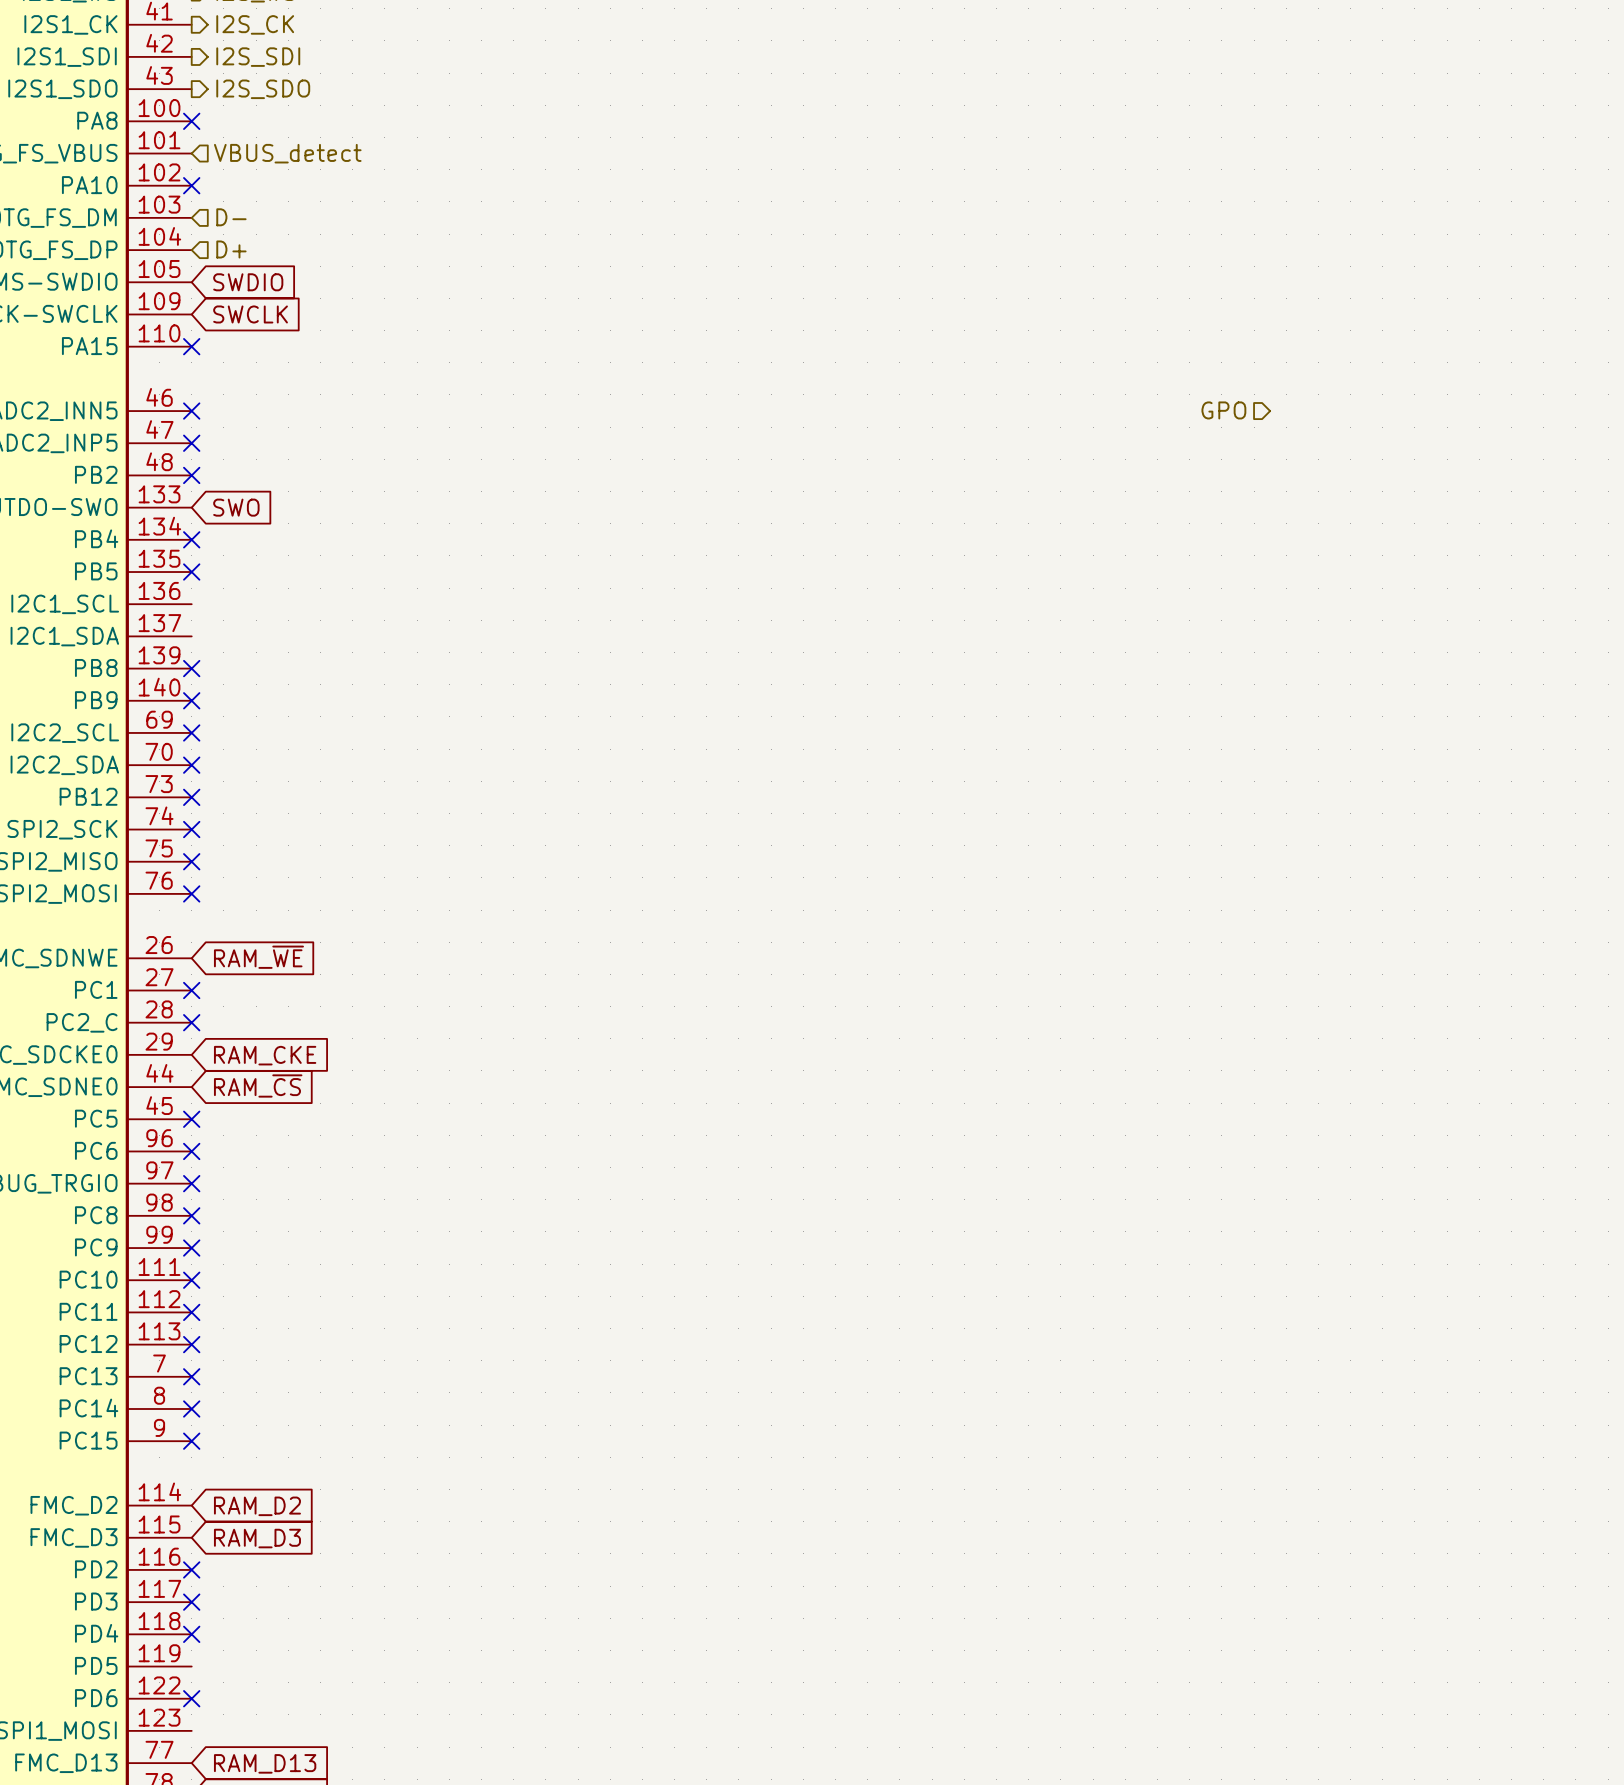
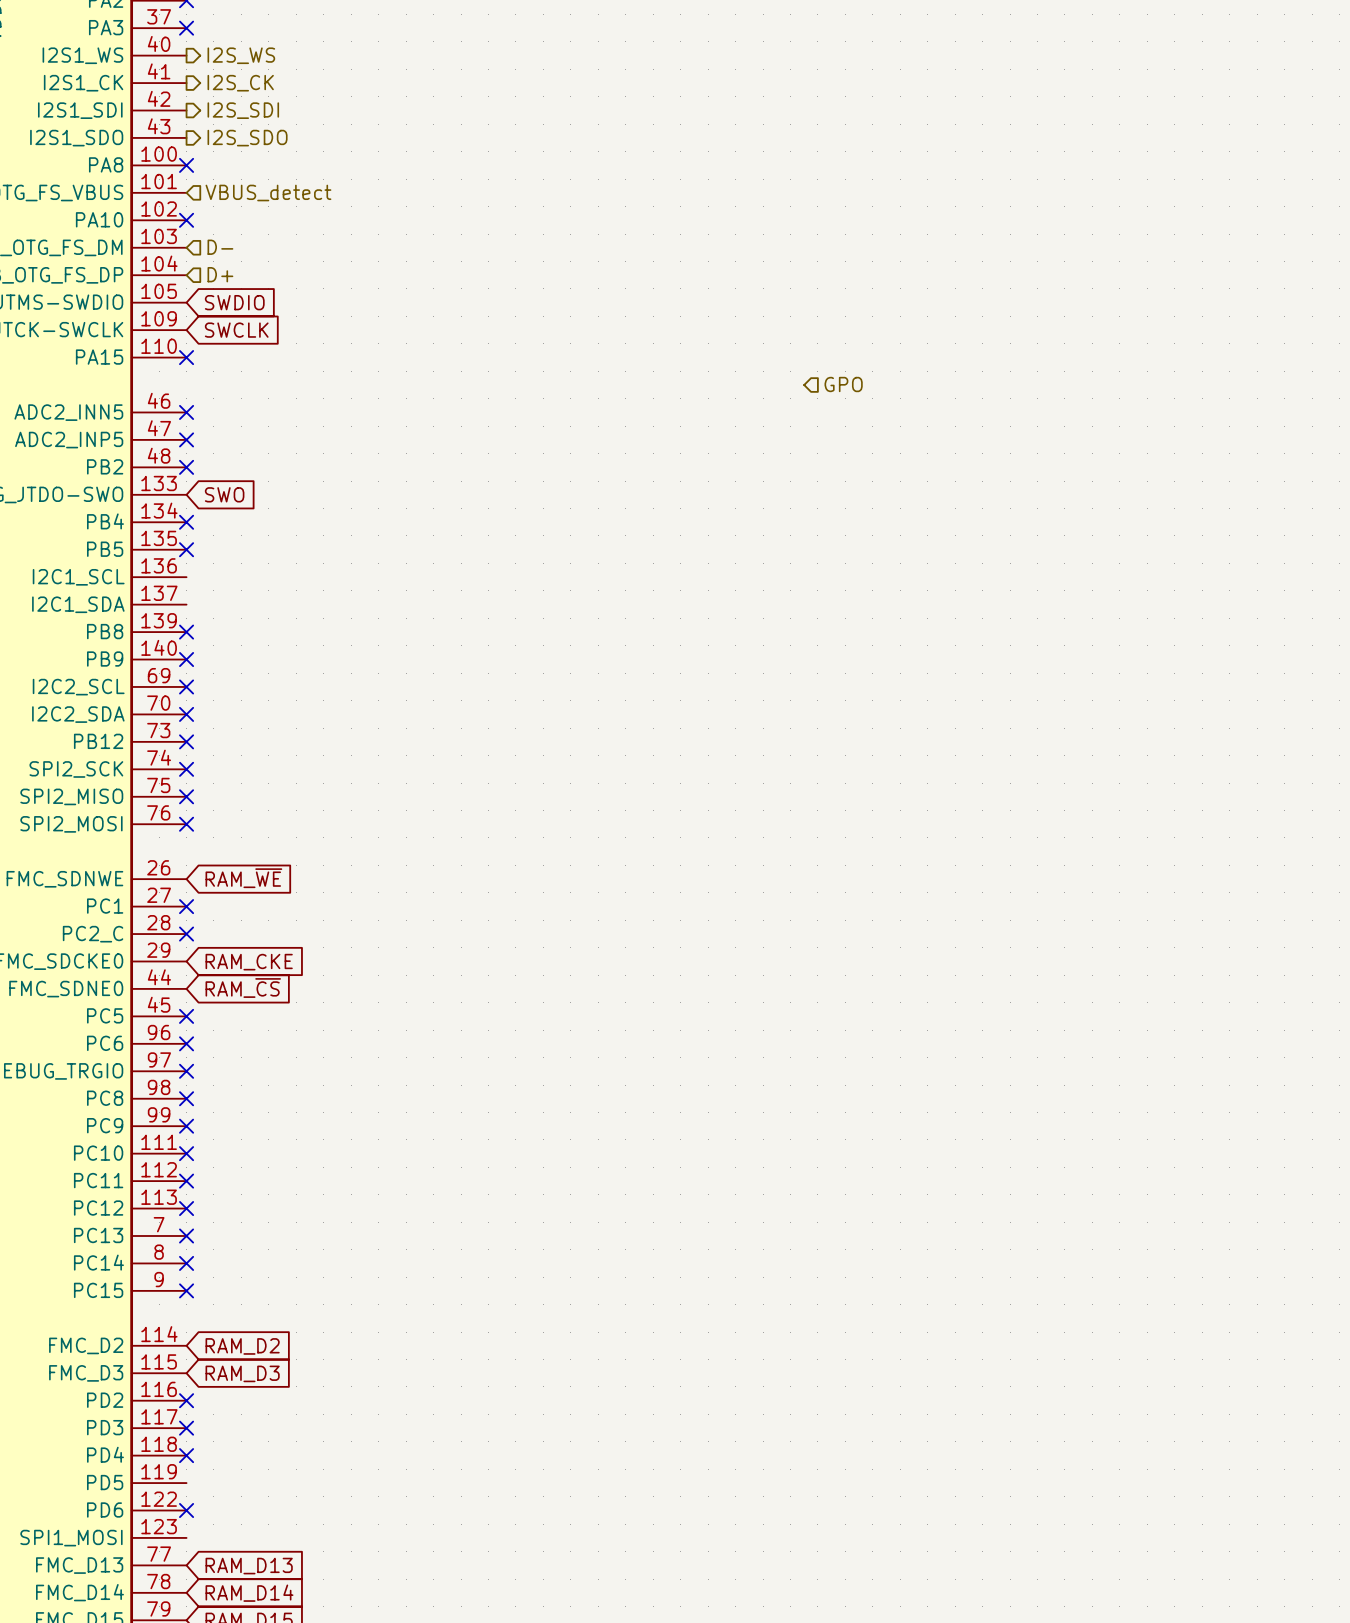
hierarchical label rotation: 0° (1223, 410) -> 180° (843, 384)
hierarchical label position: GPO (1223, 410) -> GPO (843, 384)

